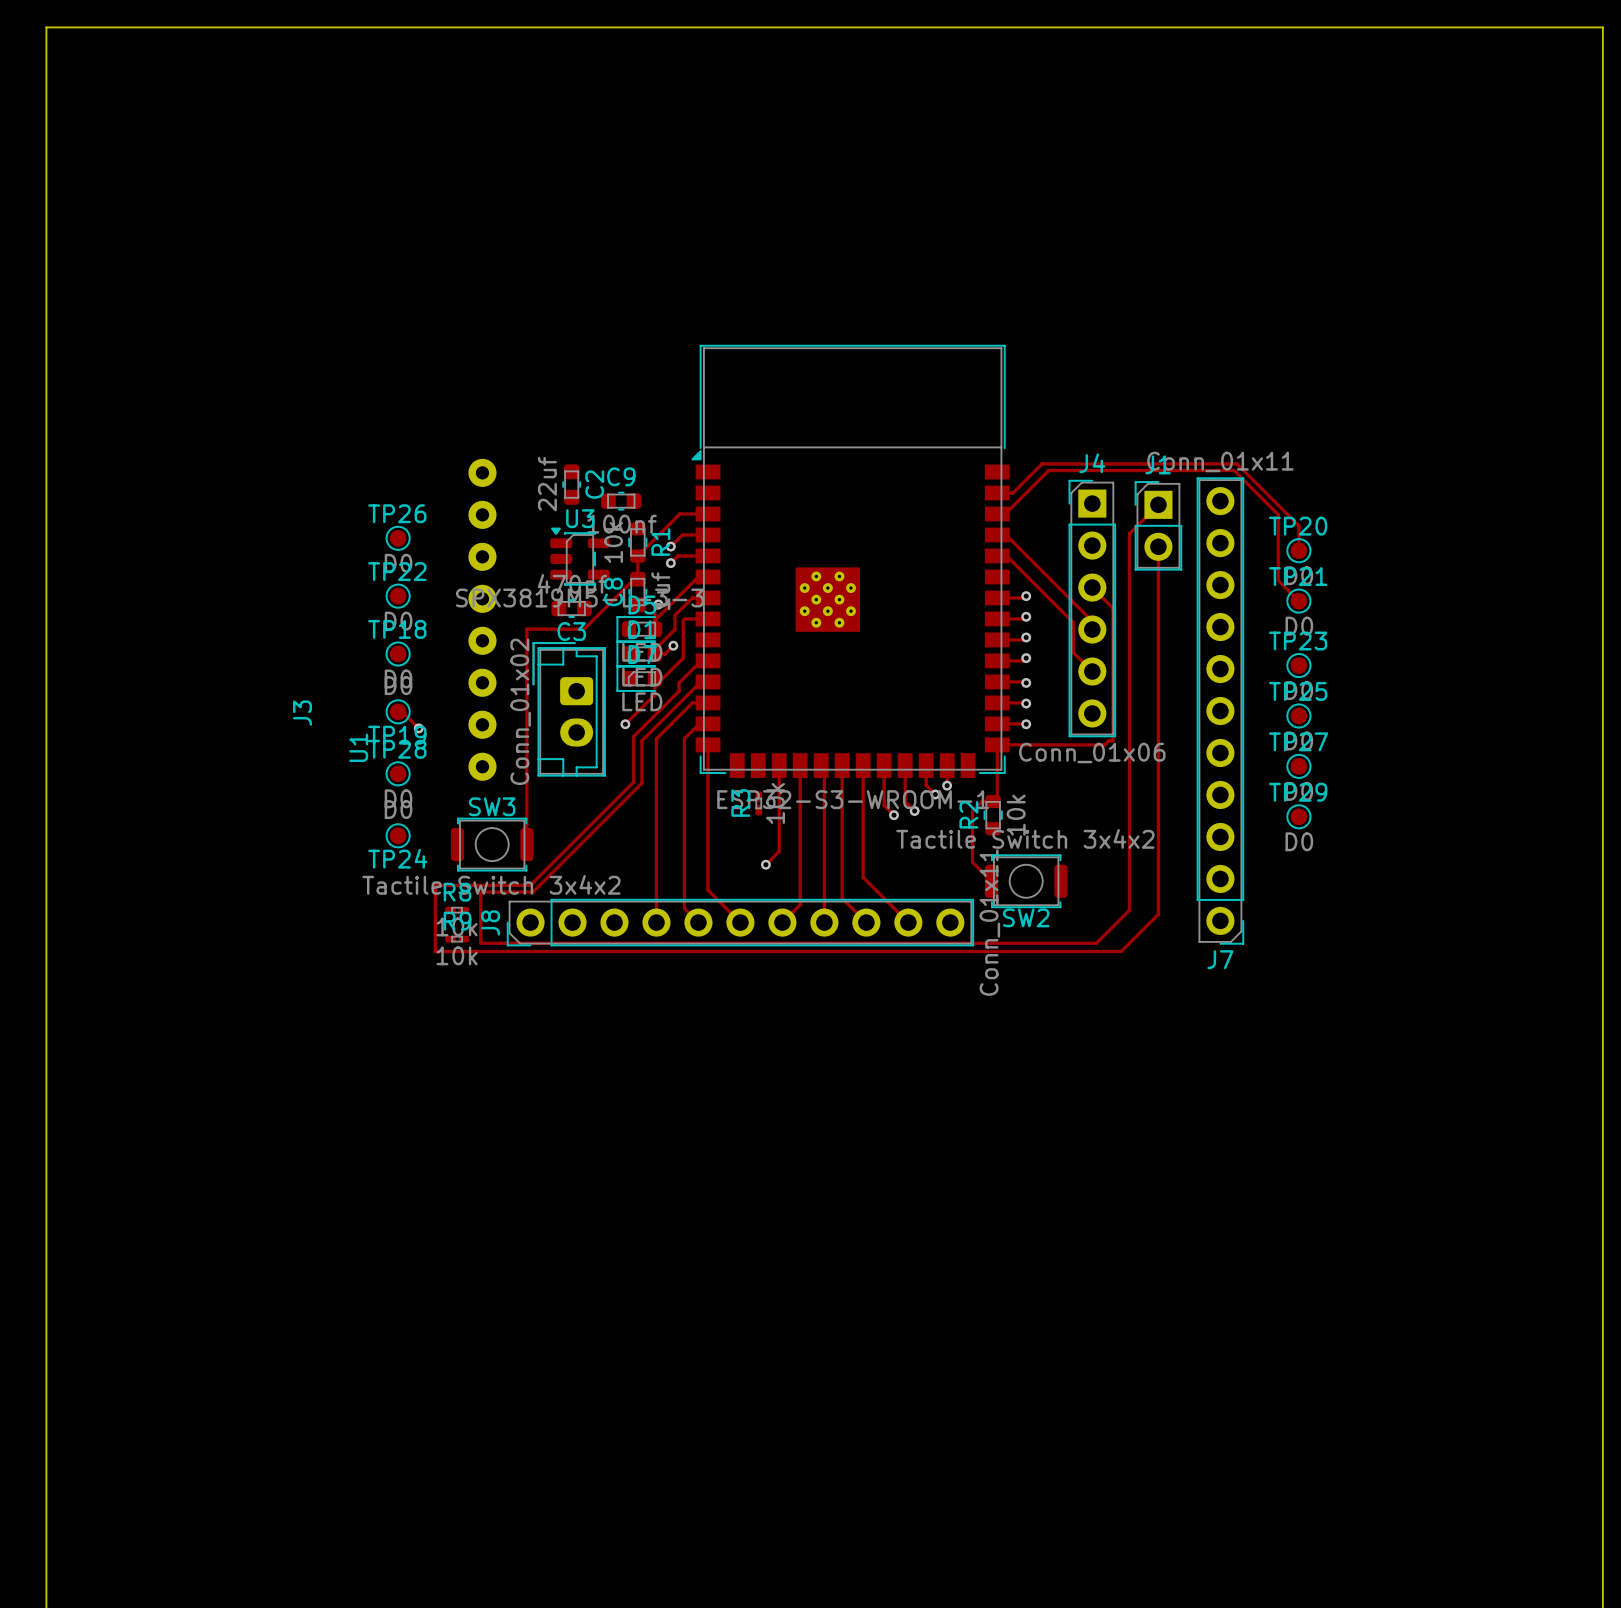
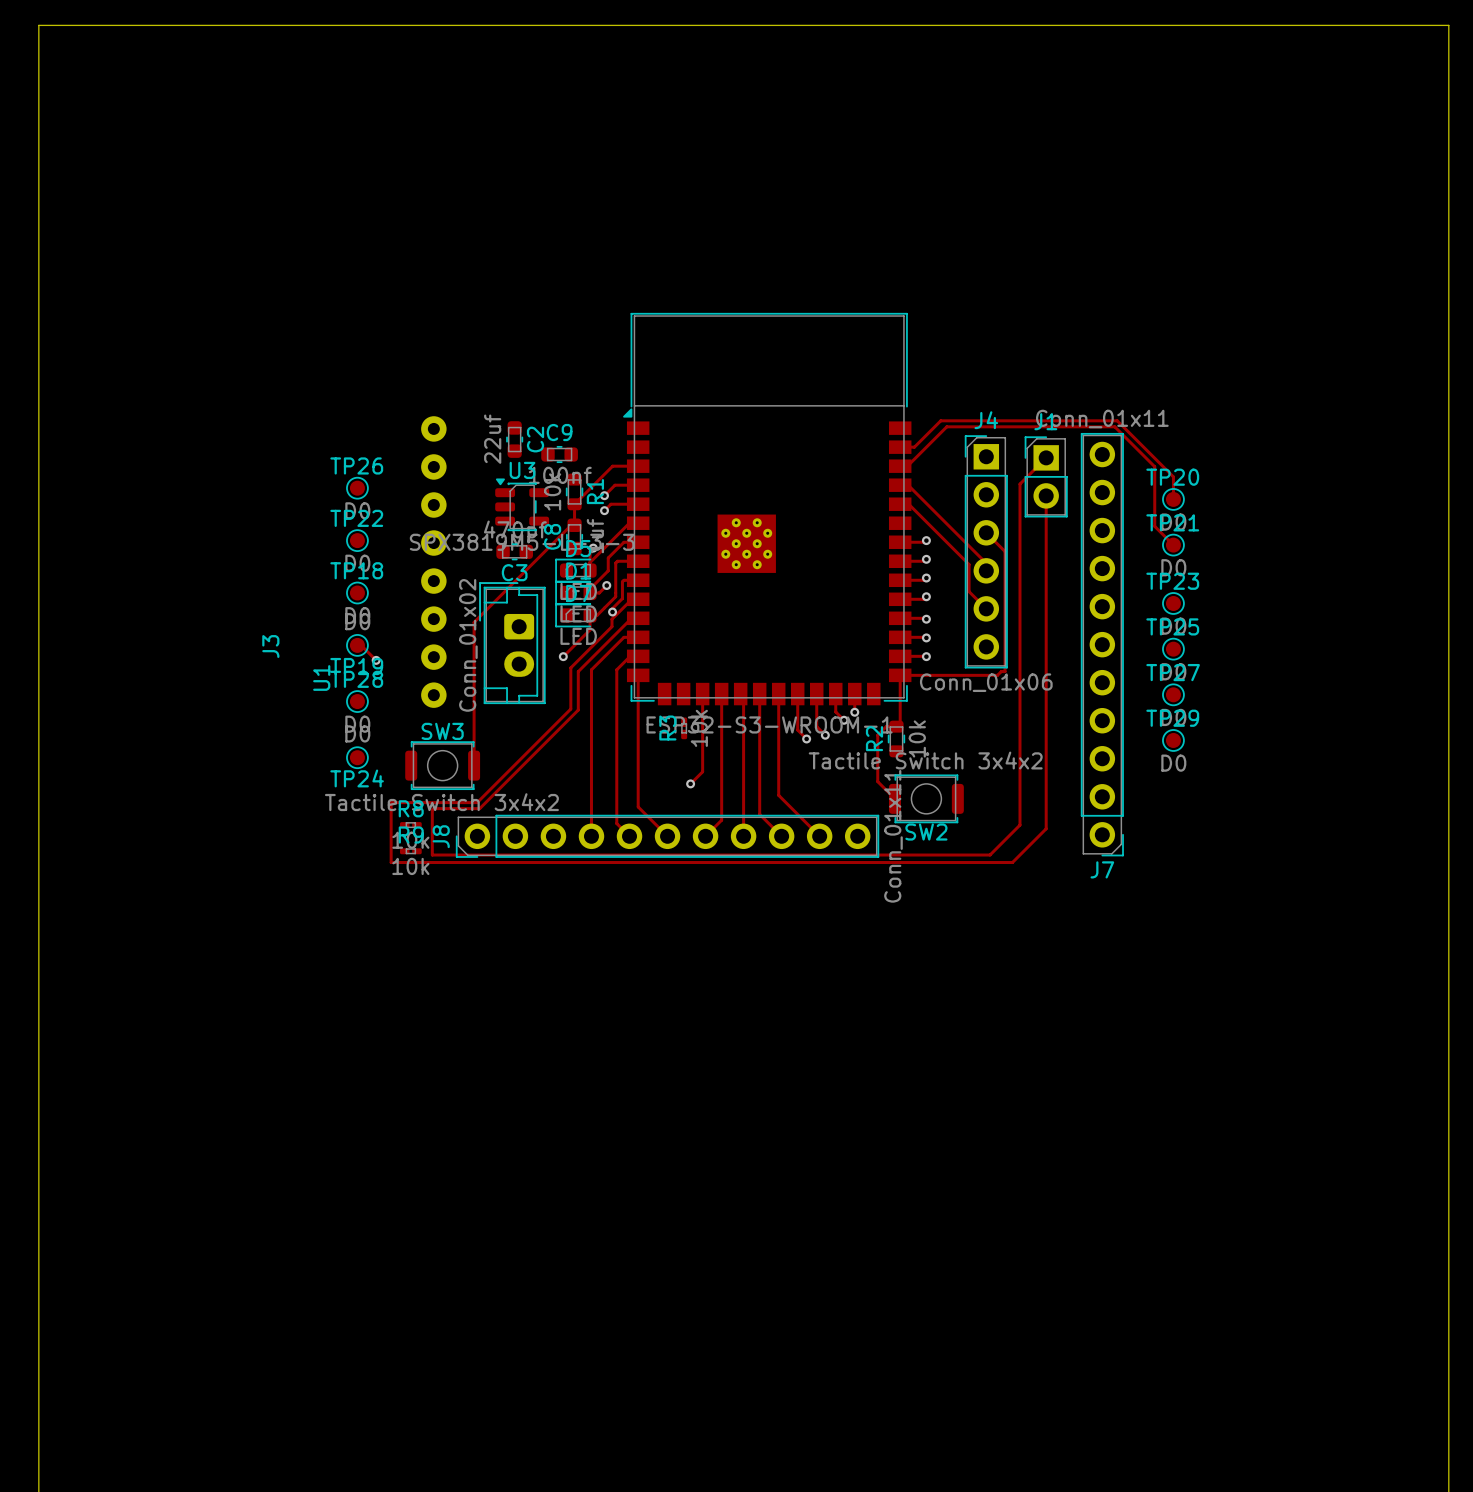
track: (584, 629) (526, 629) (526, 686) -> (525, 570) (474, 622)
track: none -> (638, 580) (622, 581) (622, 598) (612, 608) (612, 611)
via: none -> (612, 611)

